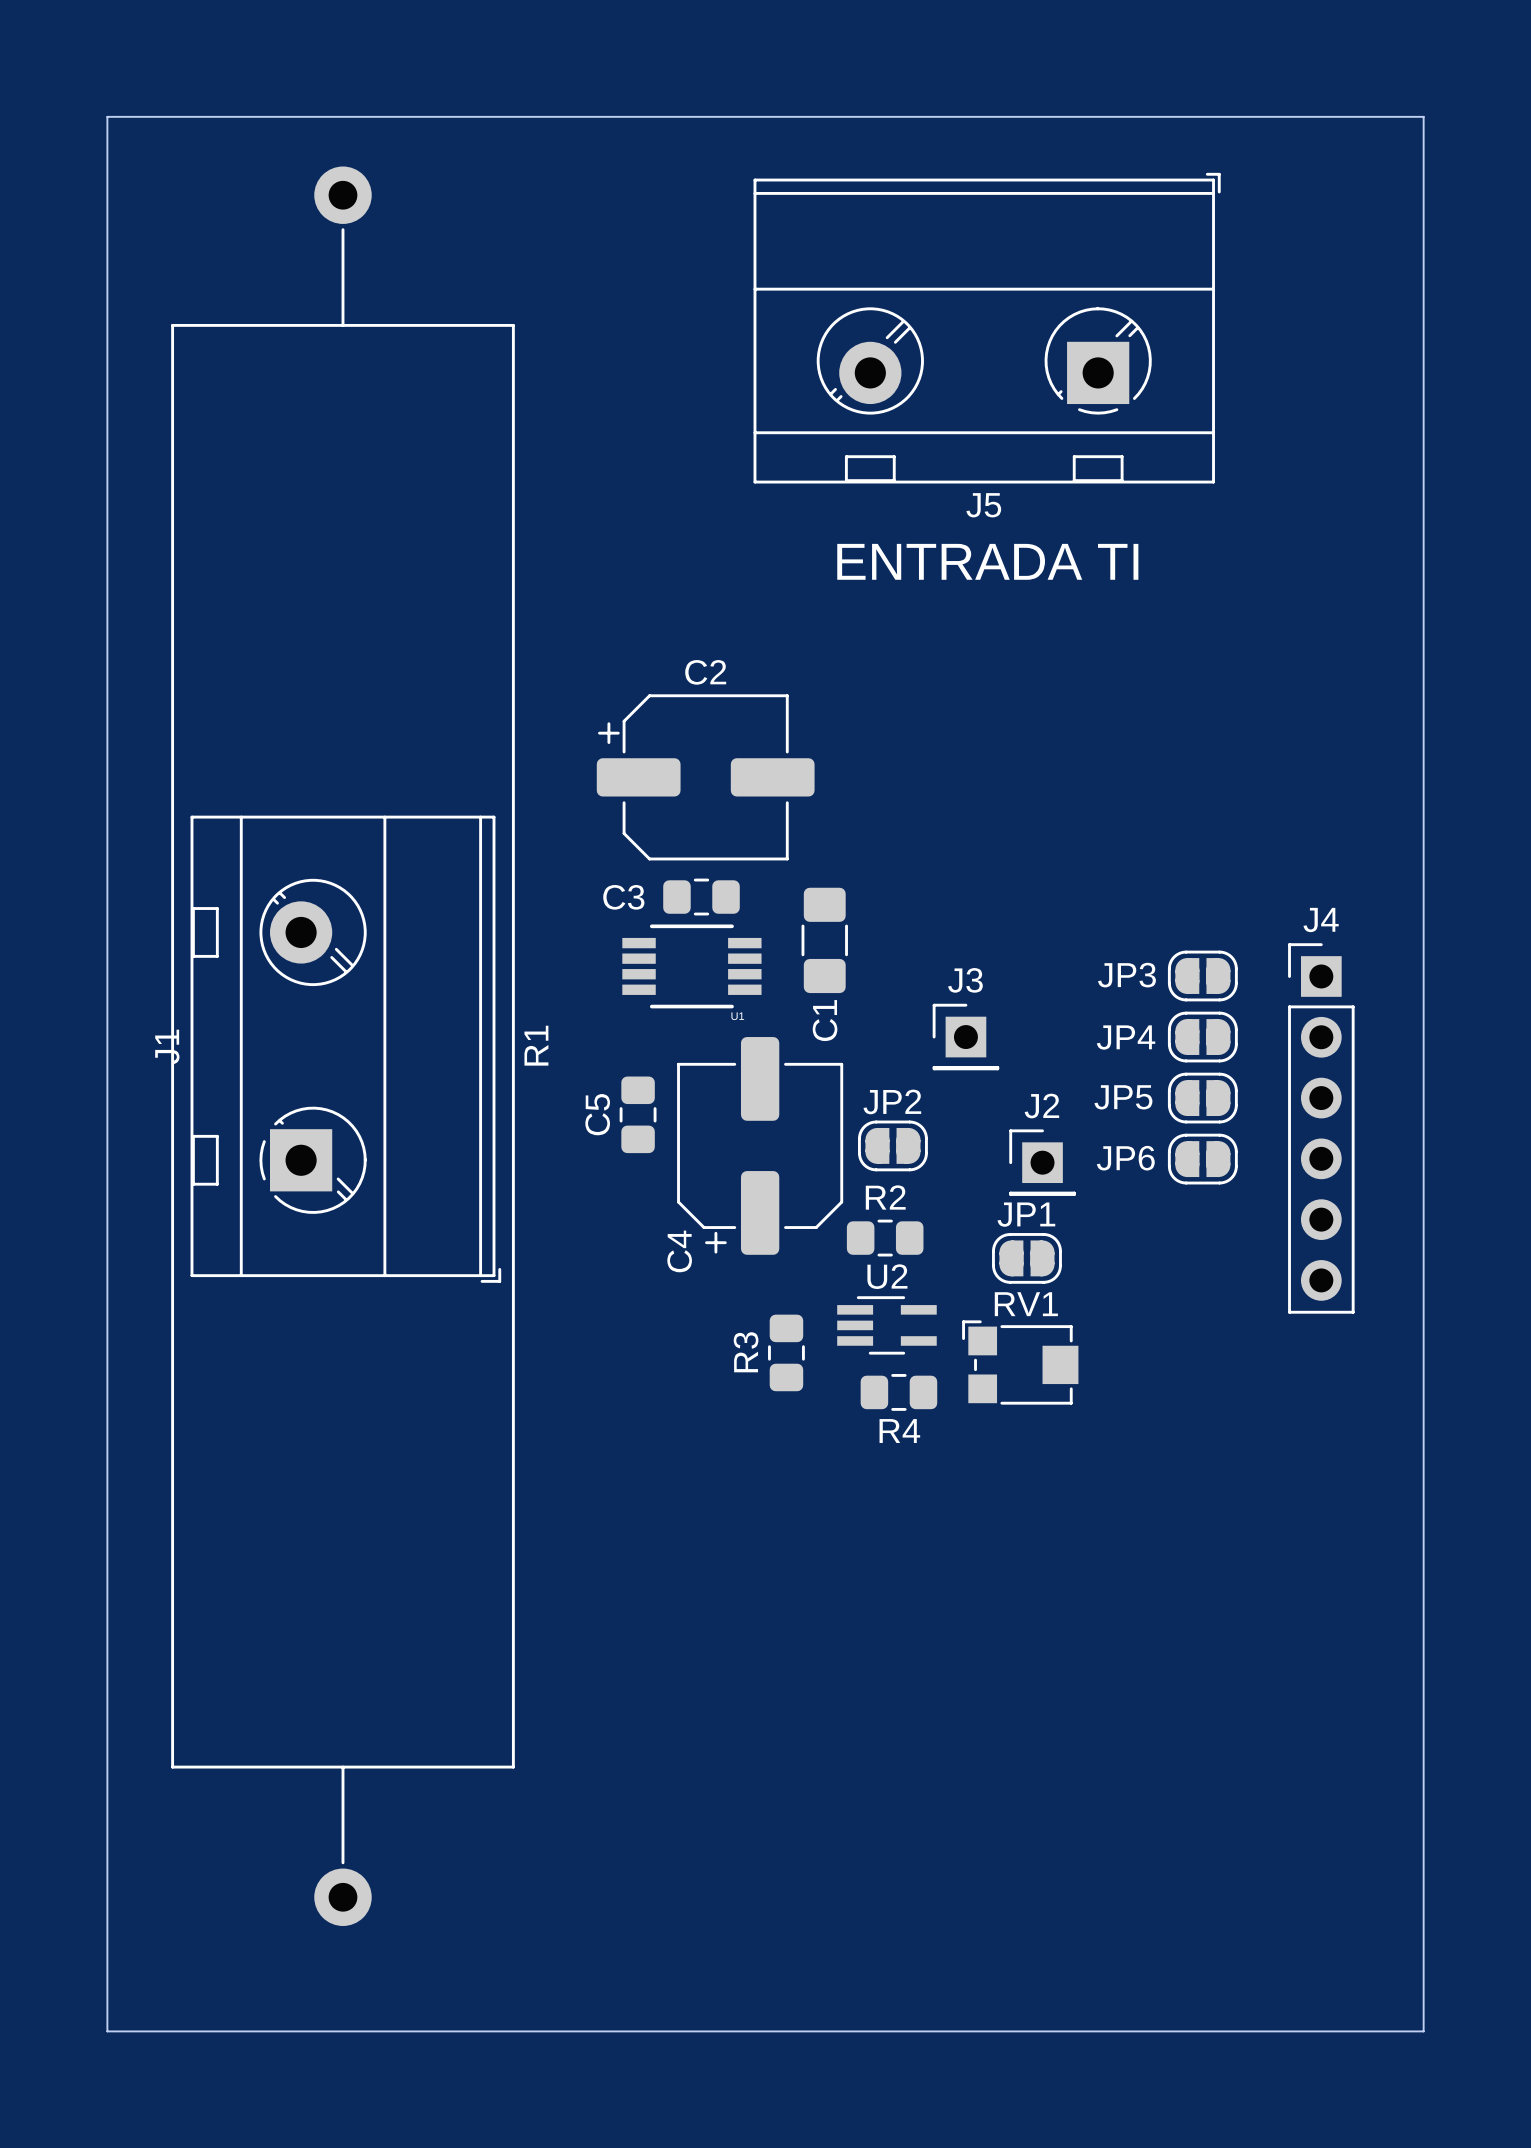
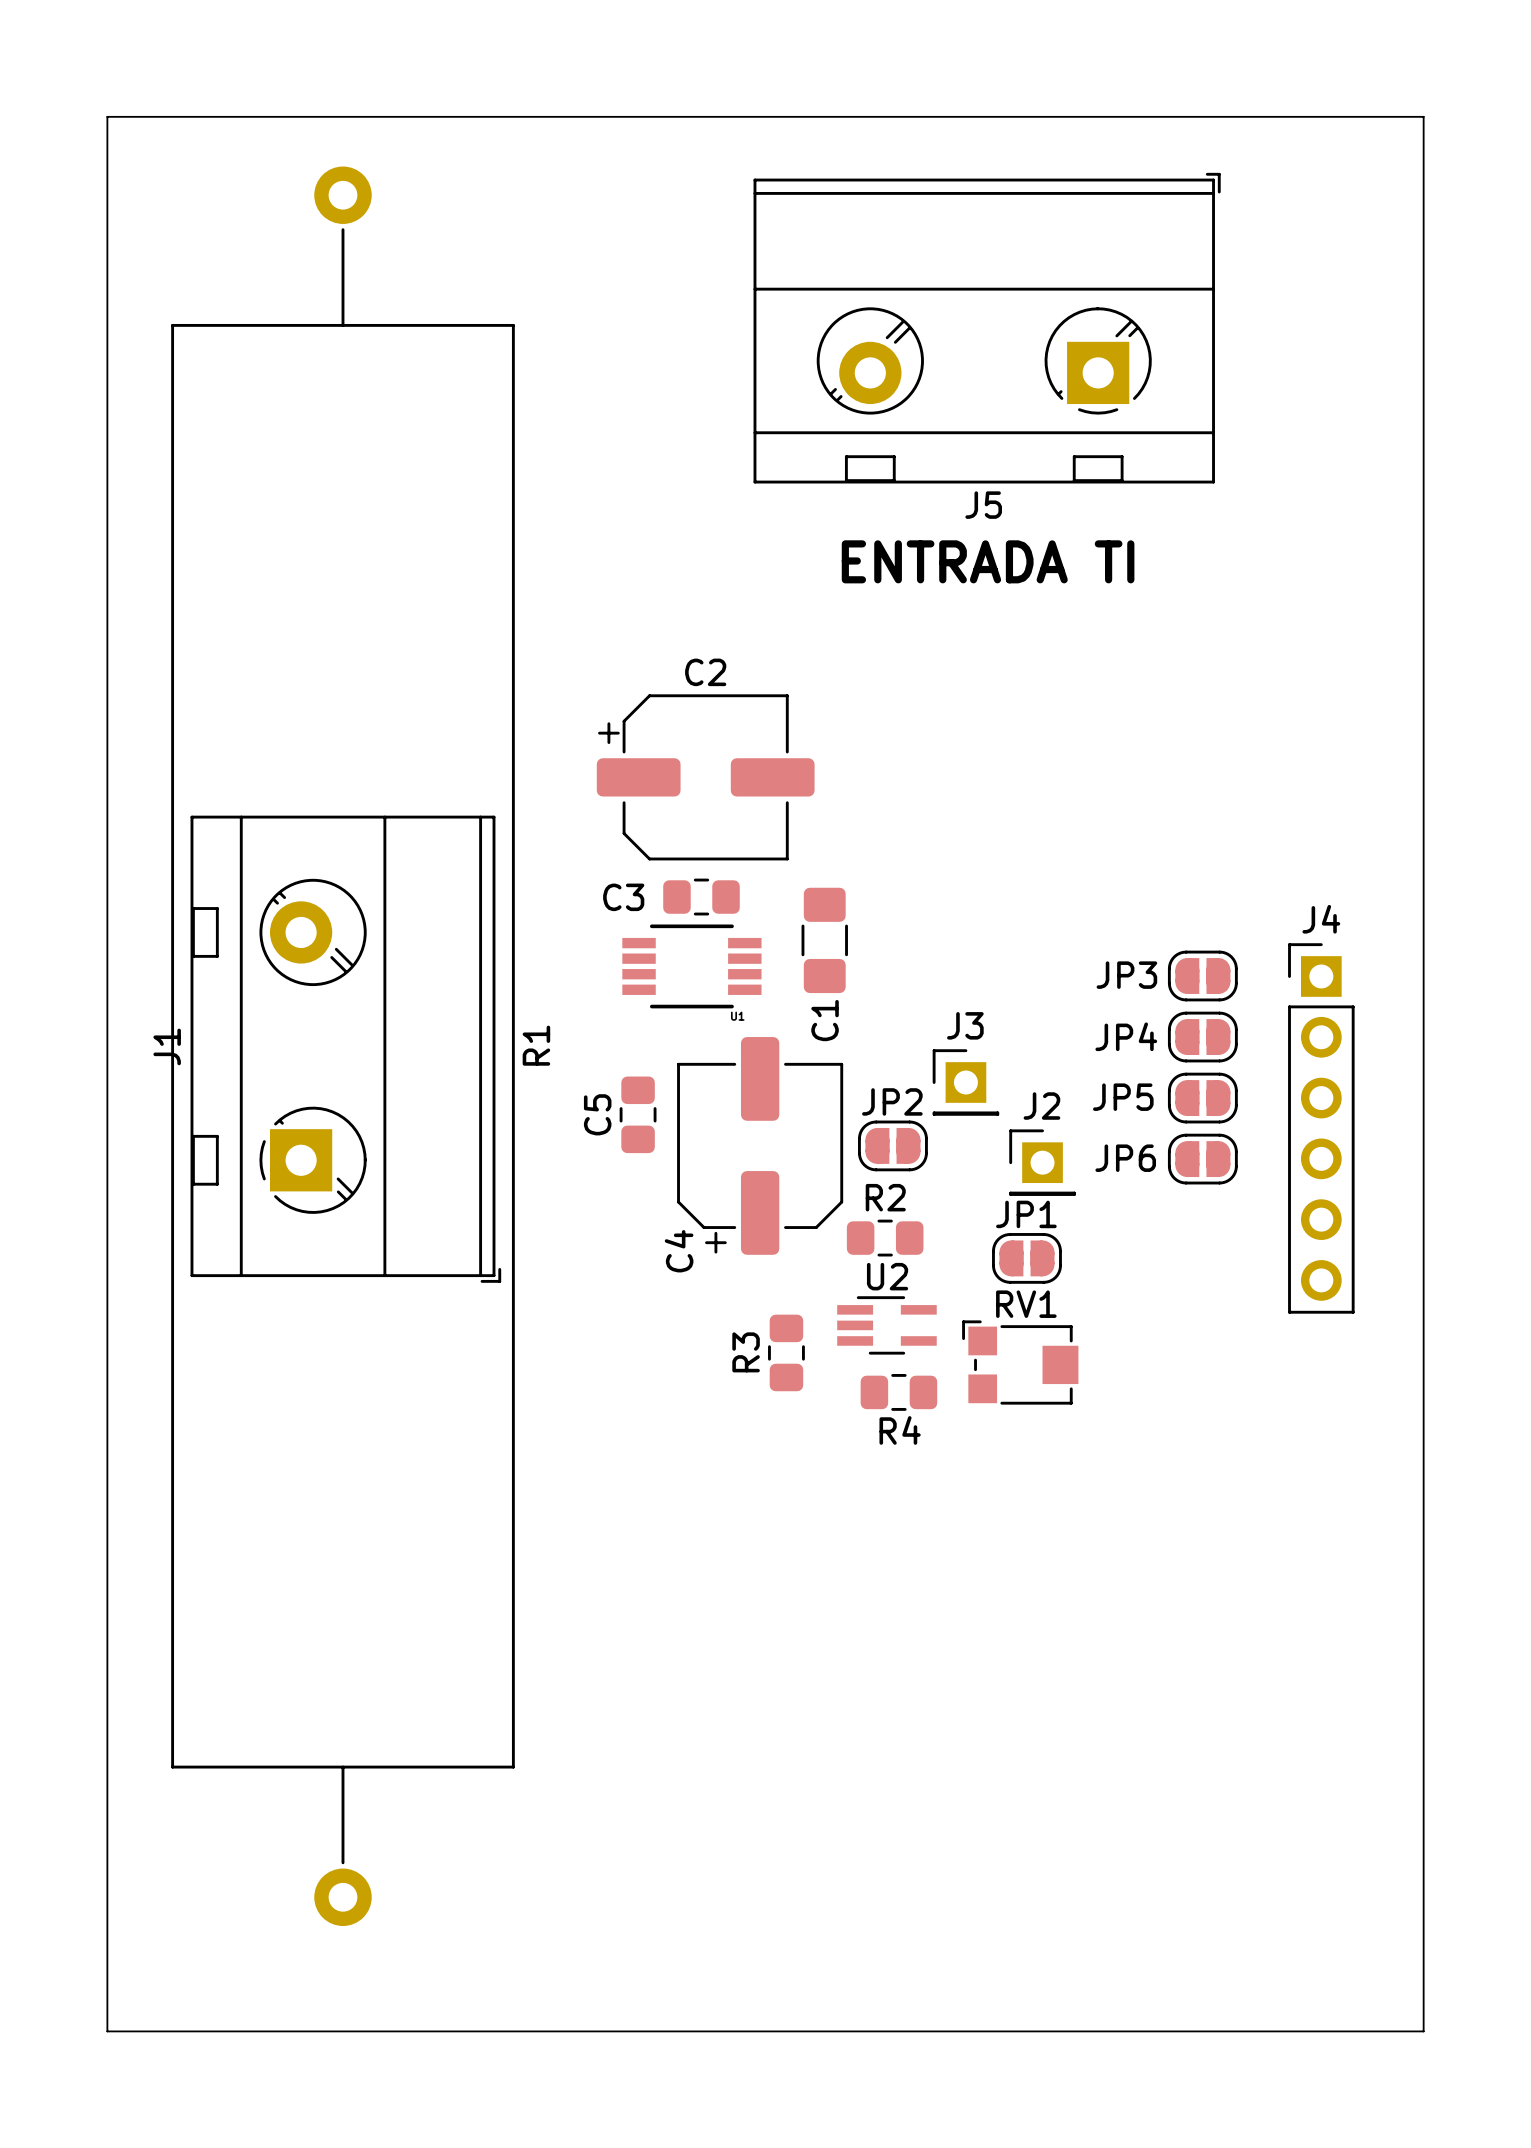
J3 position: (965, 1037) -> (965, 1082)

